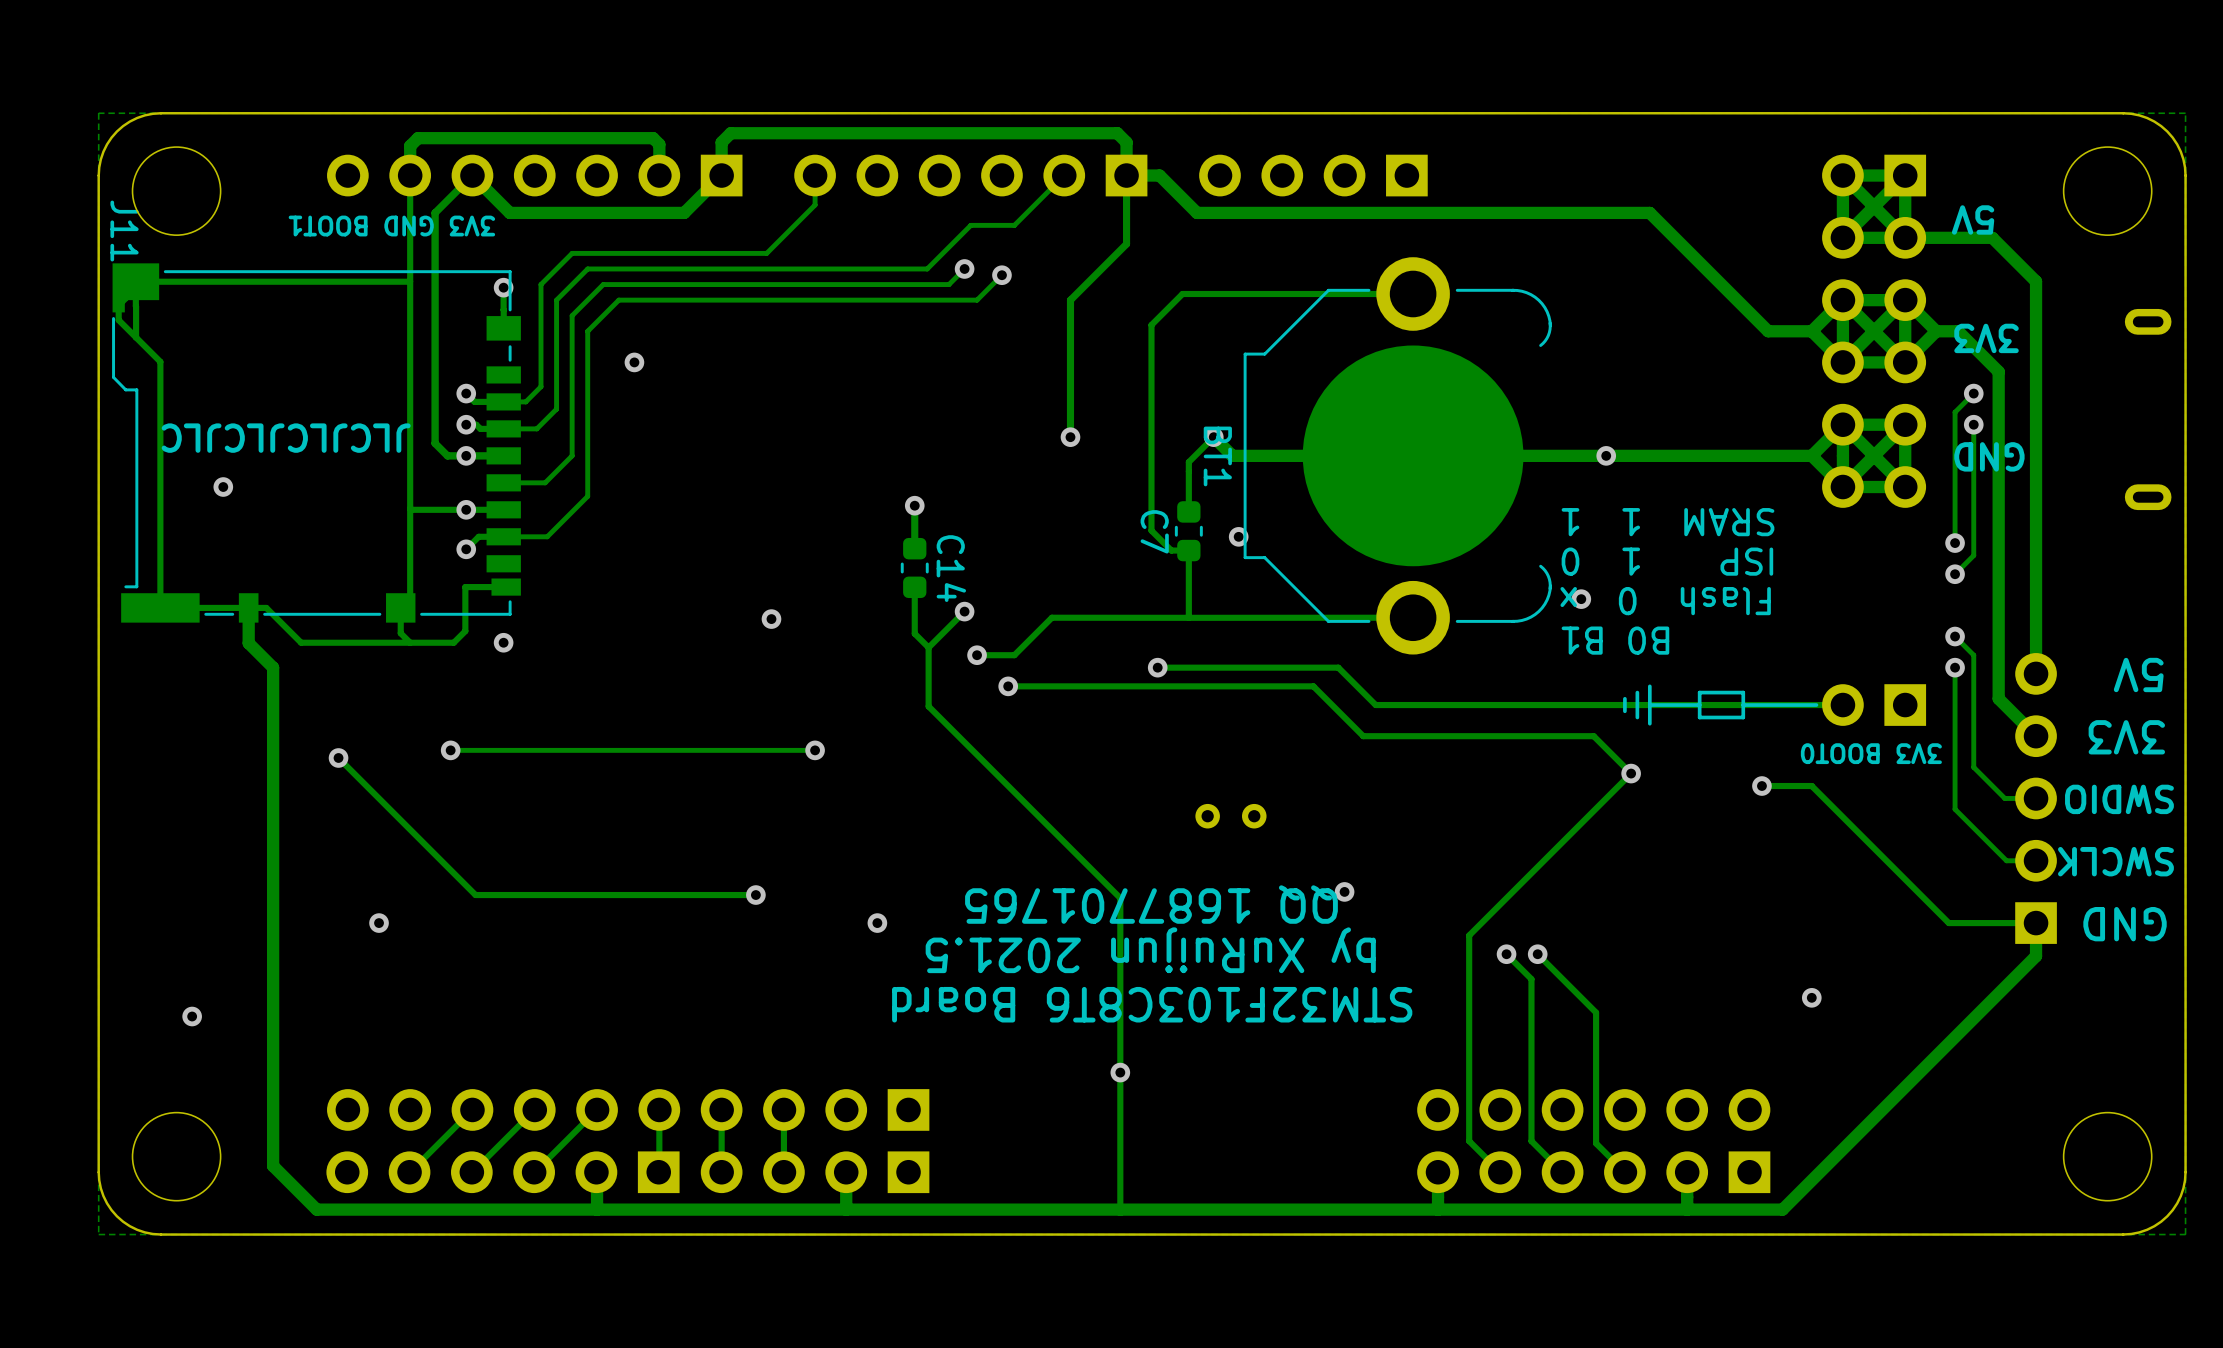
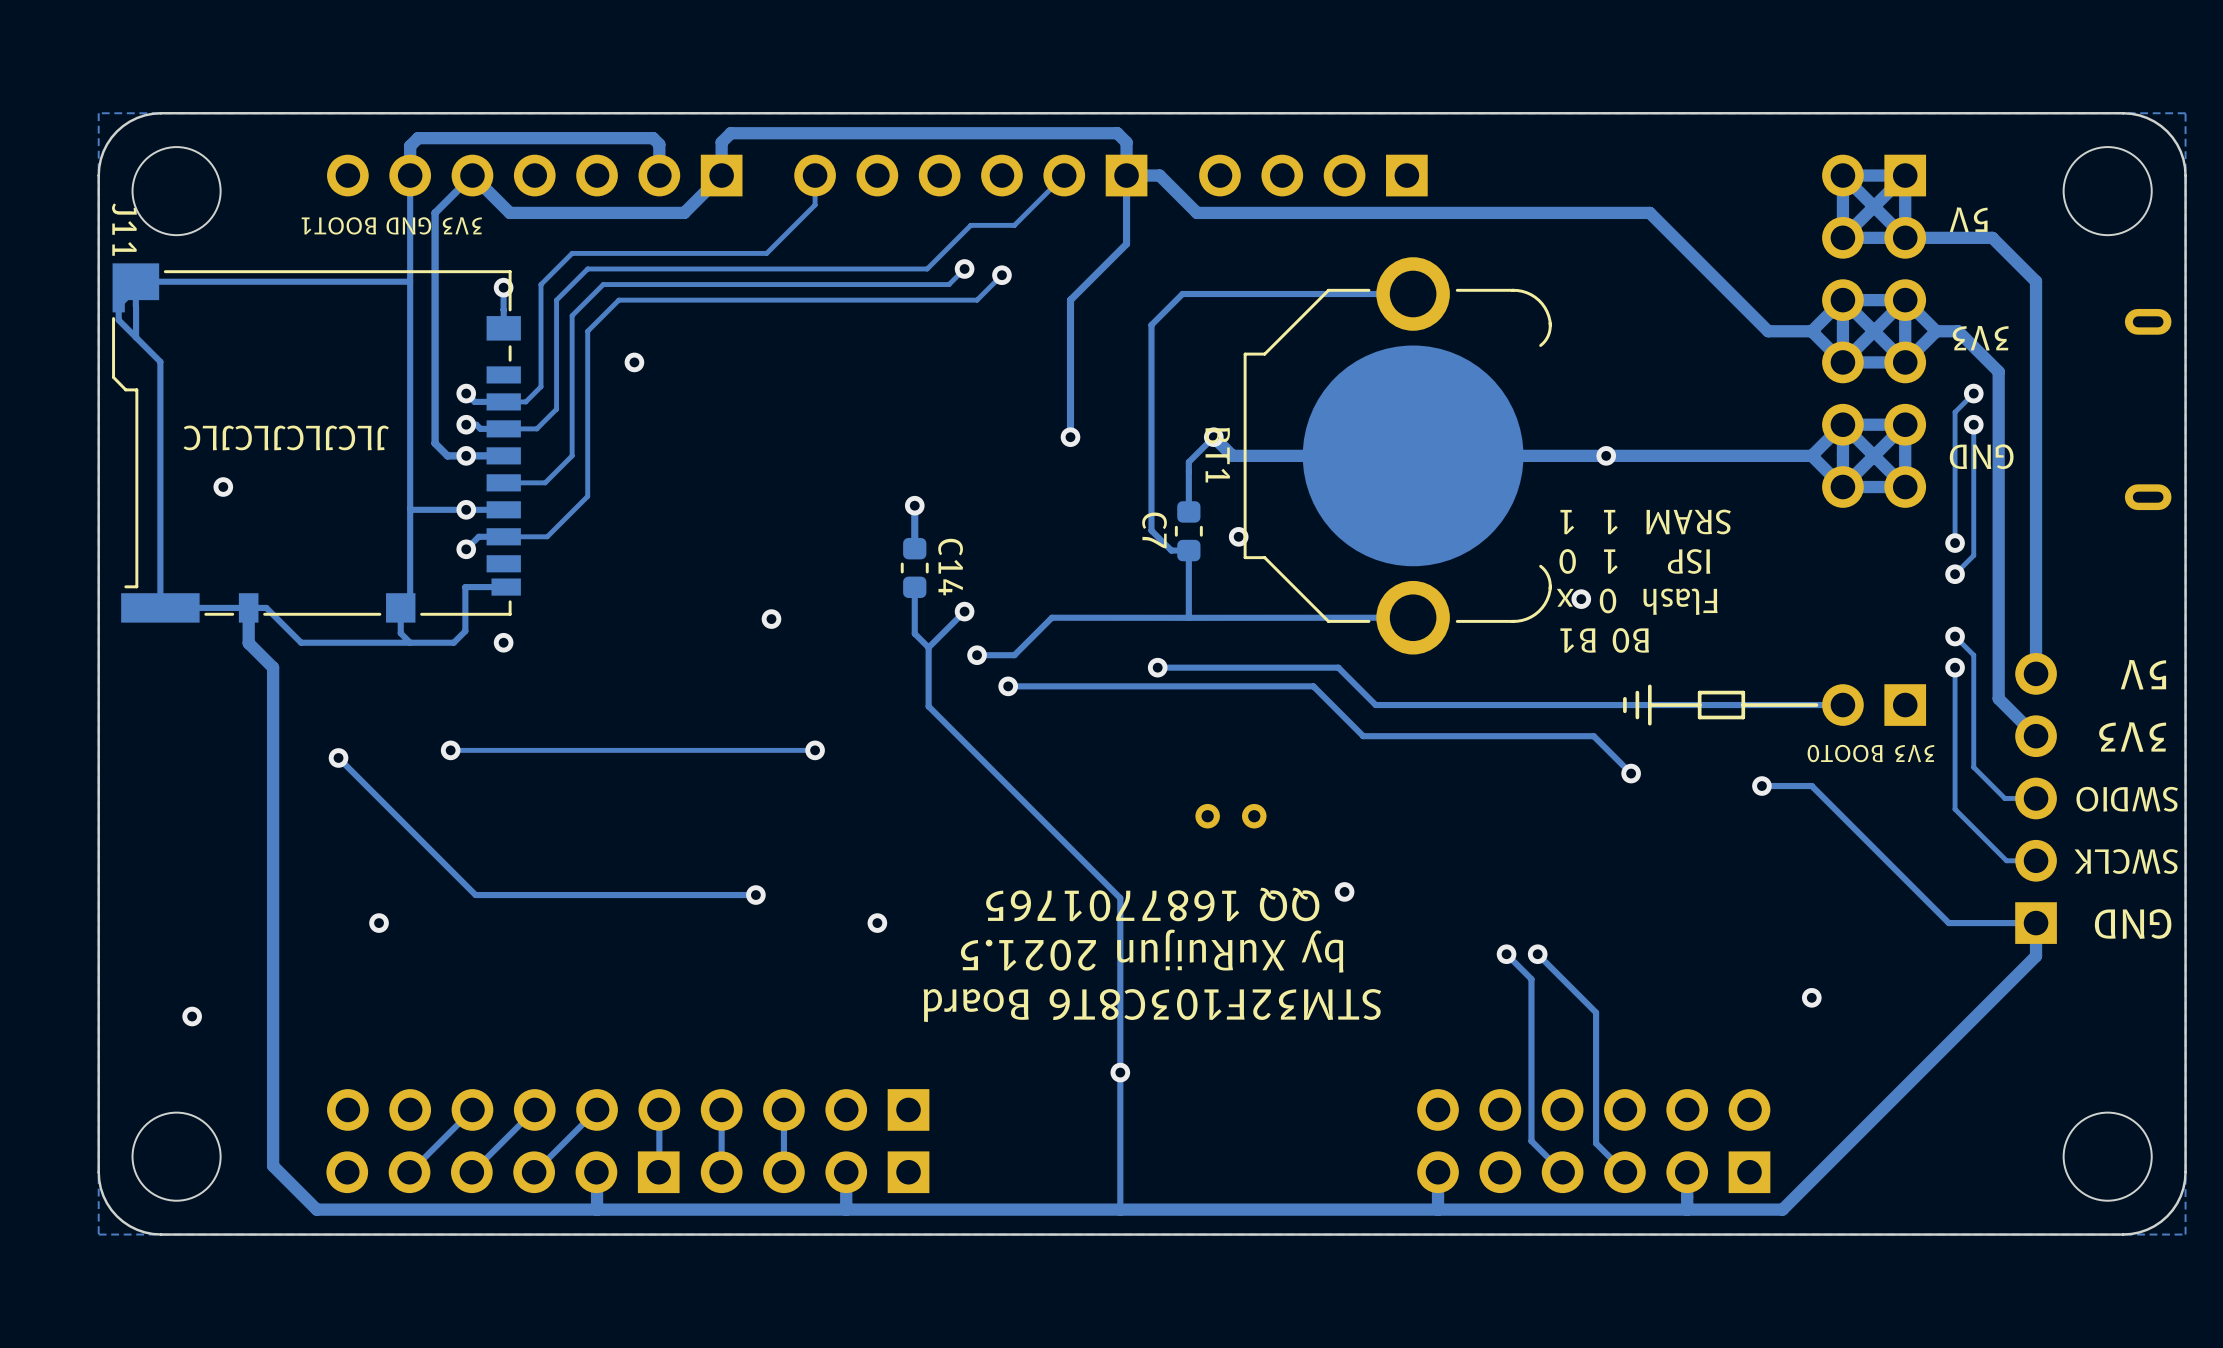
track: (1631, 773) (1469, 935) (1469, 1141) (1500, 1172) -> none

